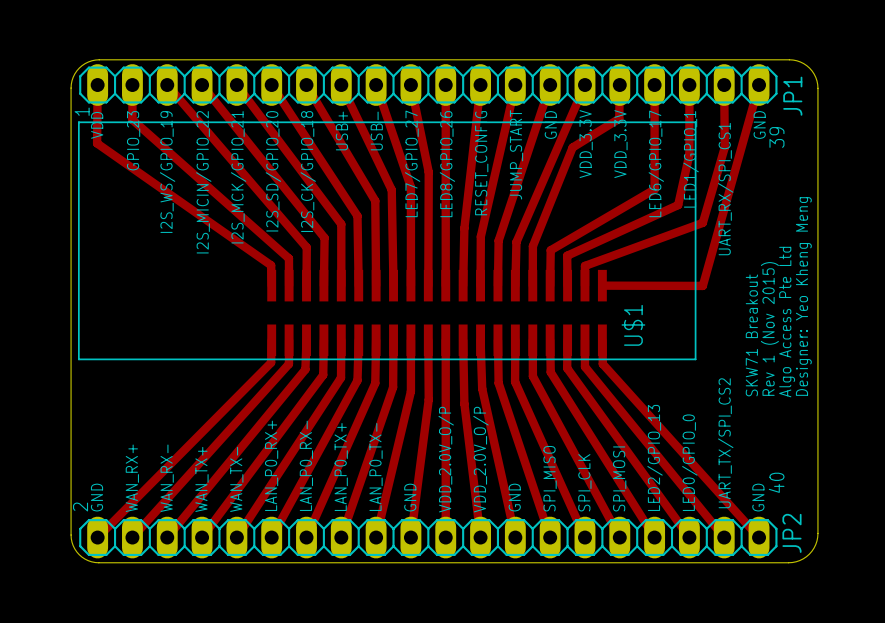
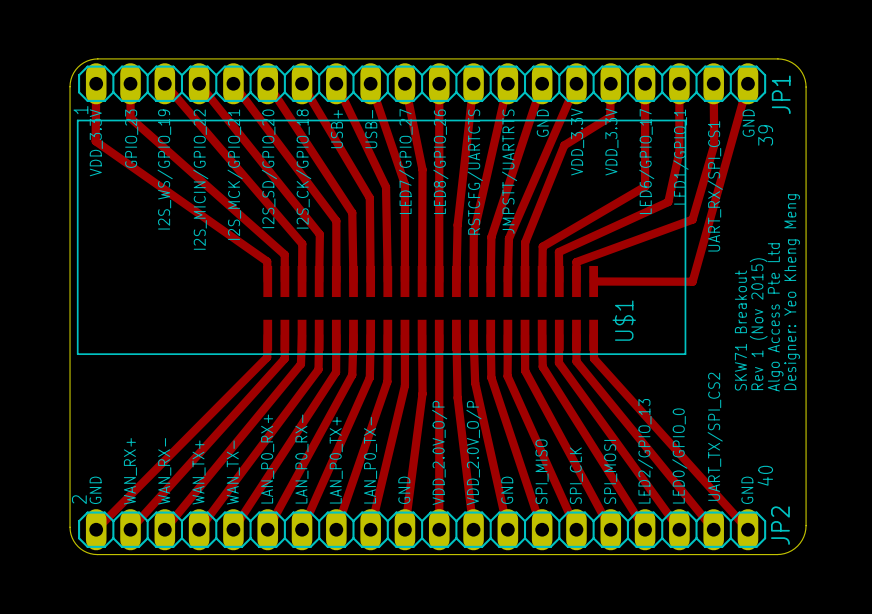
text: VDD (97, 125) -> VDD_3.3V (96, 142)
text: JUMP_START (516, 154) -> JMPSTT/UARTRTS (509, 171)
text: RESET_CONFIG (481, 163) -> RSTCFG/UARTCTS (475, 172)

